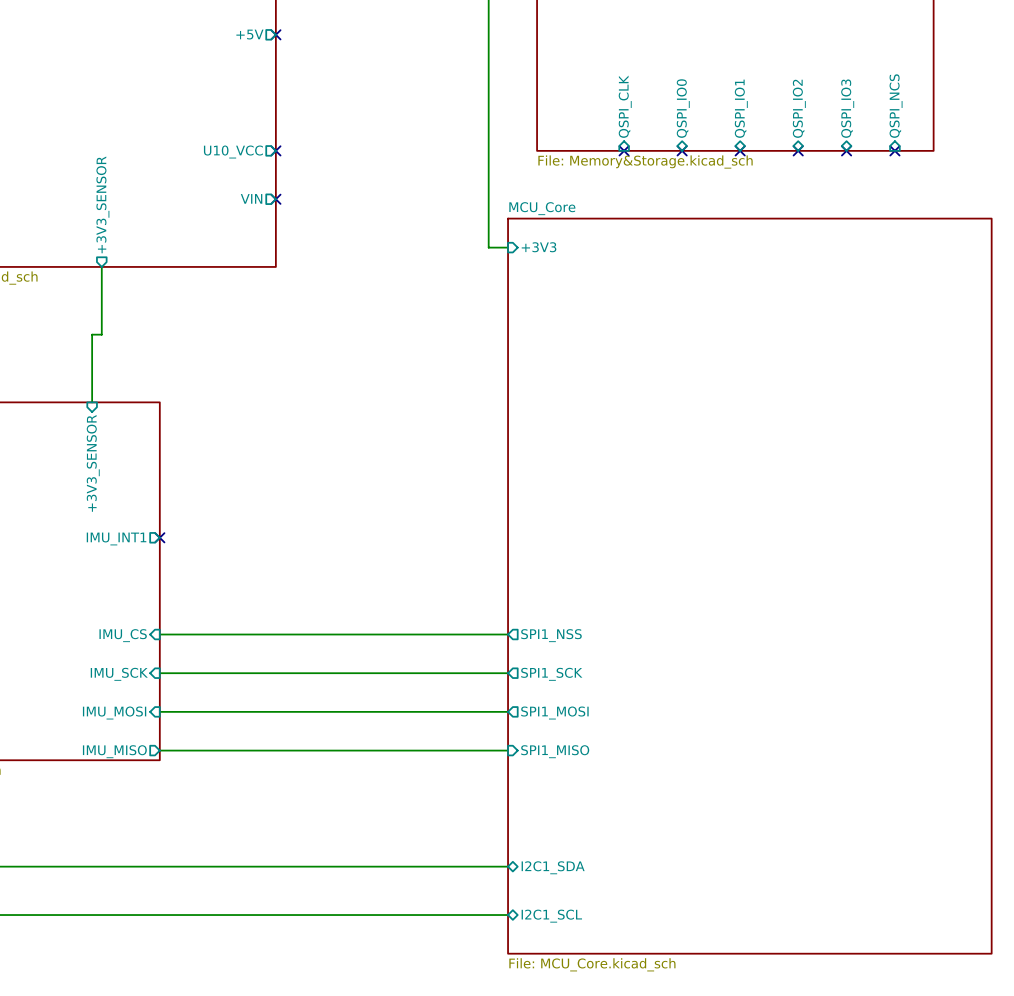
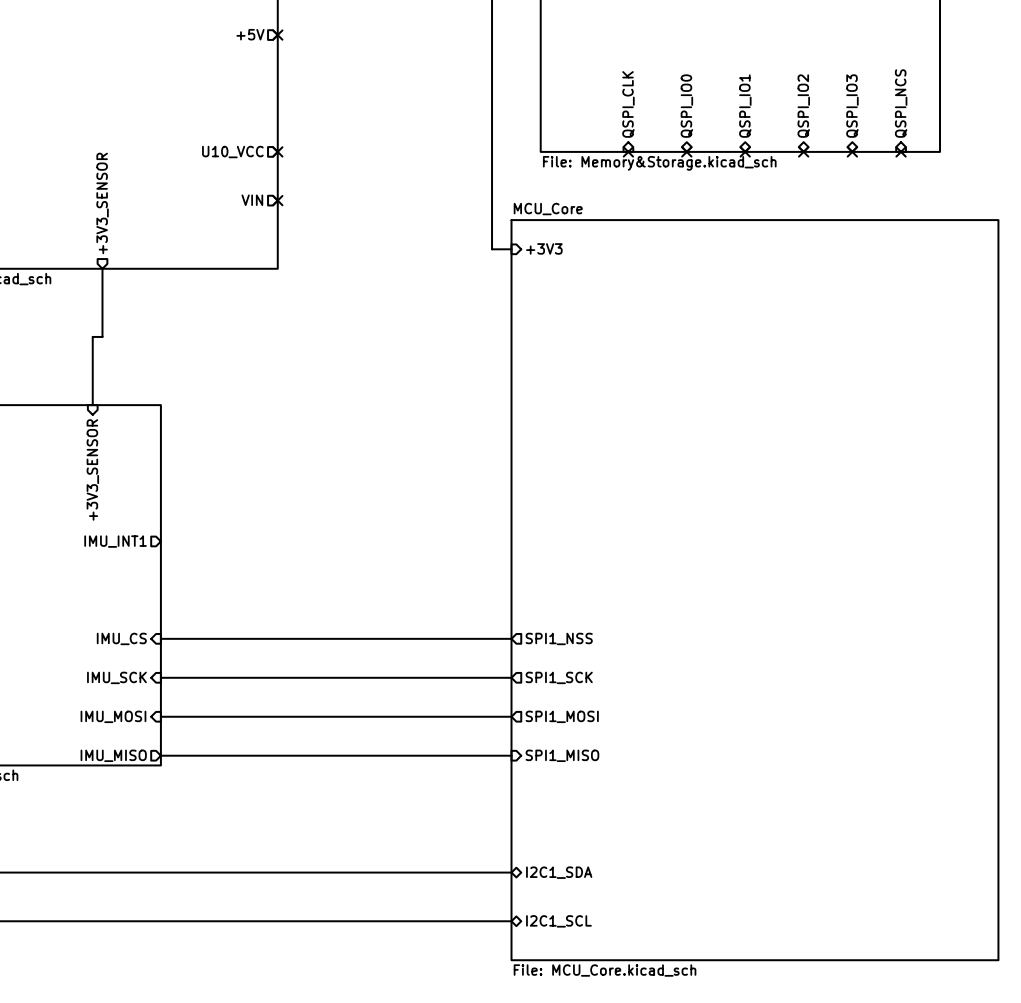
no-connect mark: (159, 537) -> none

